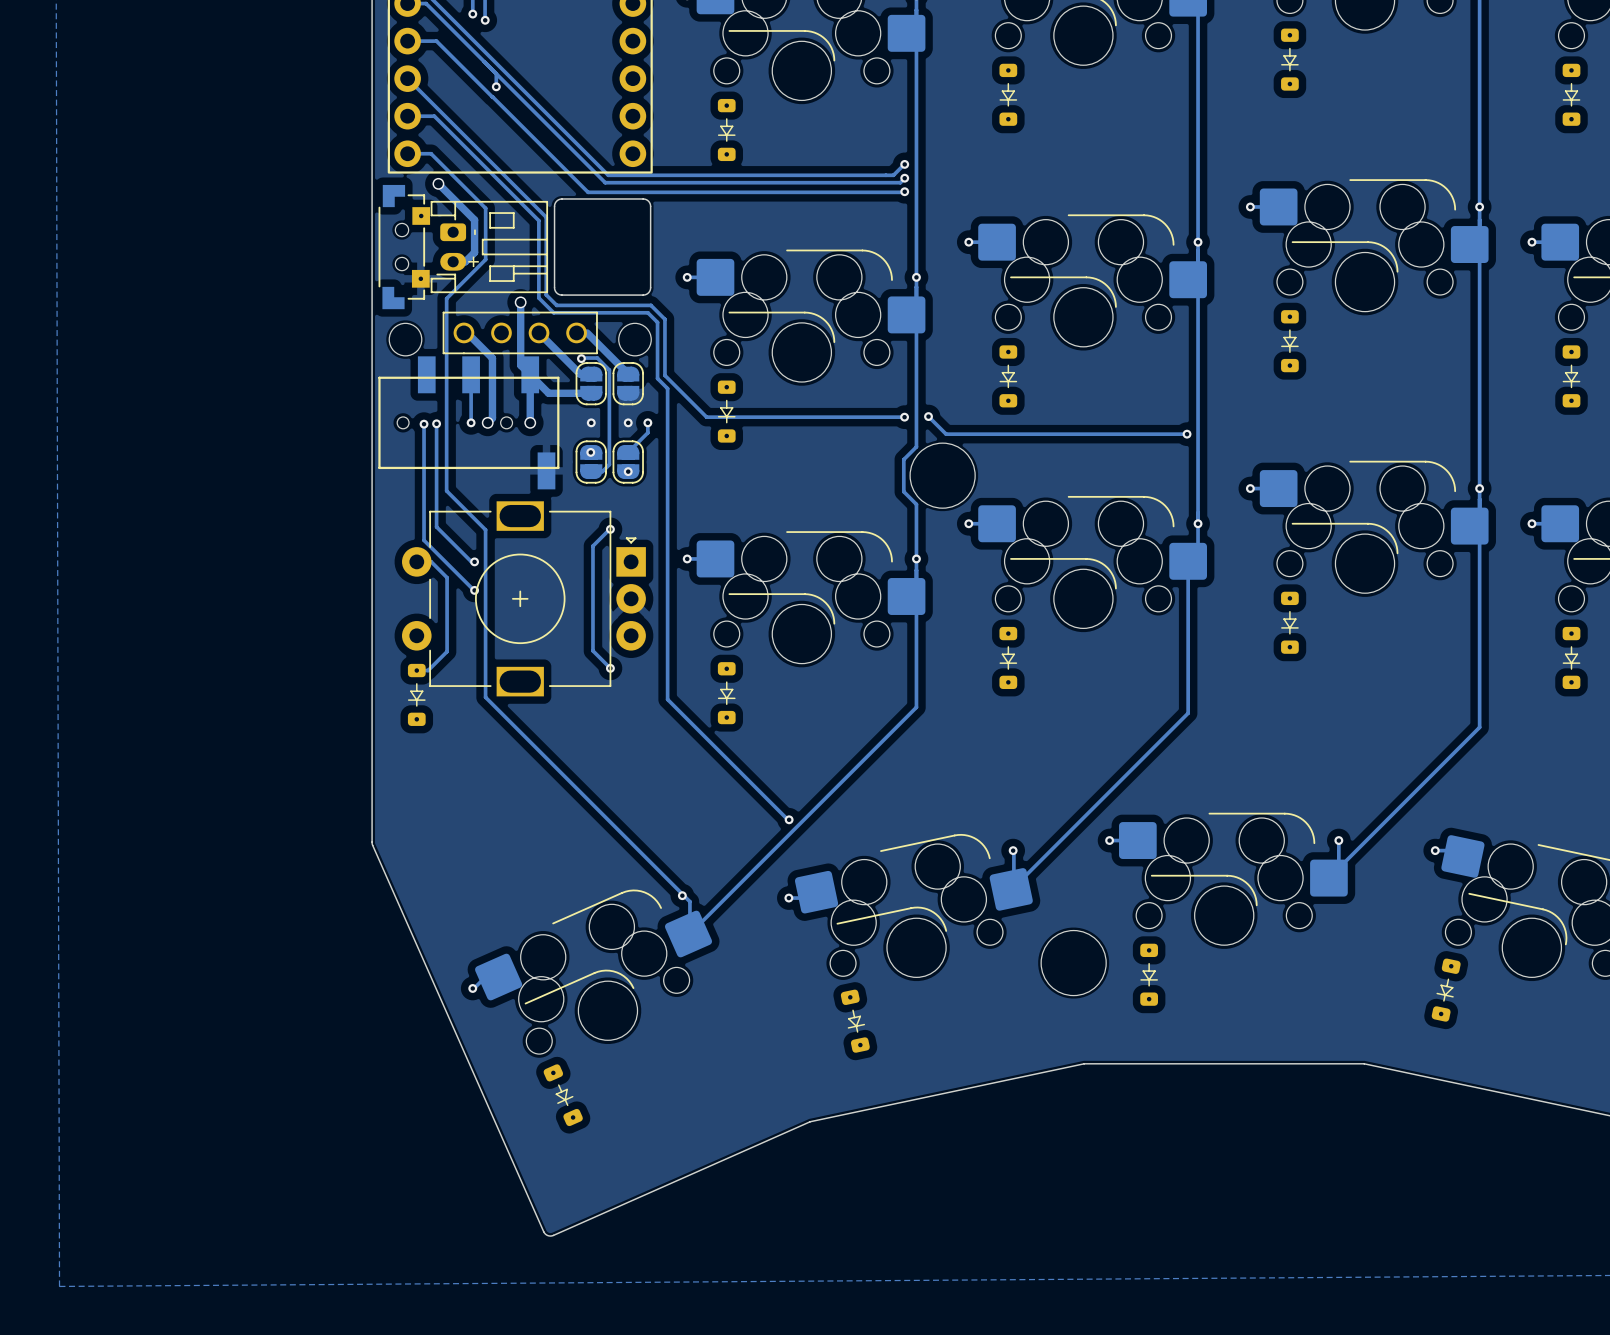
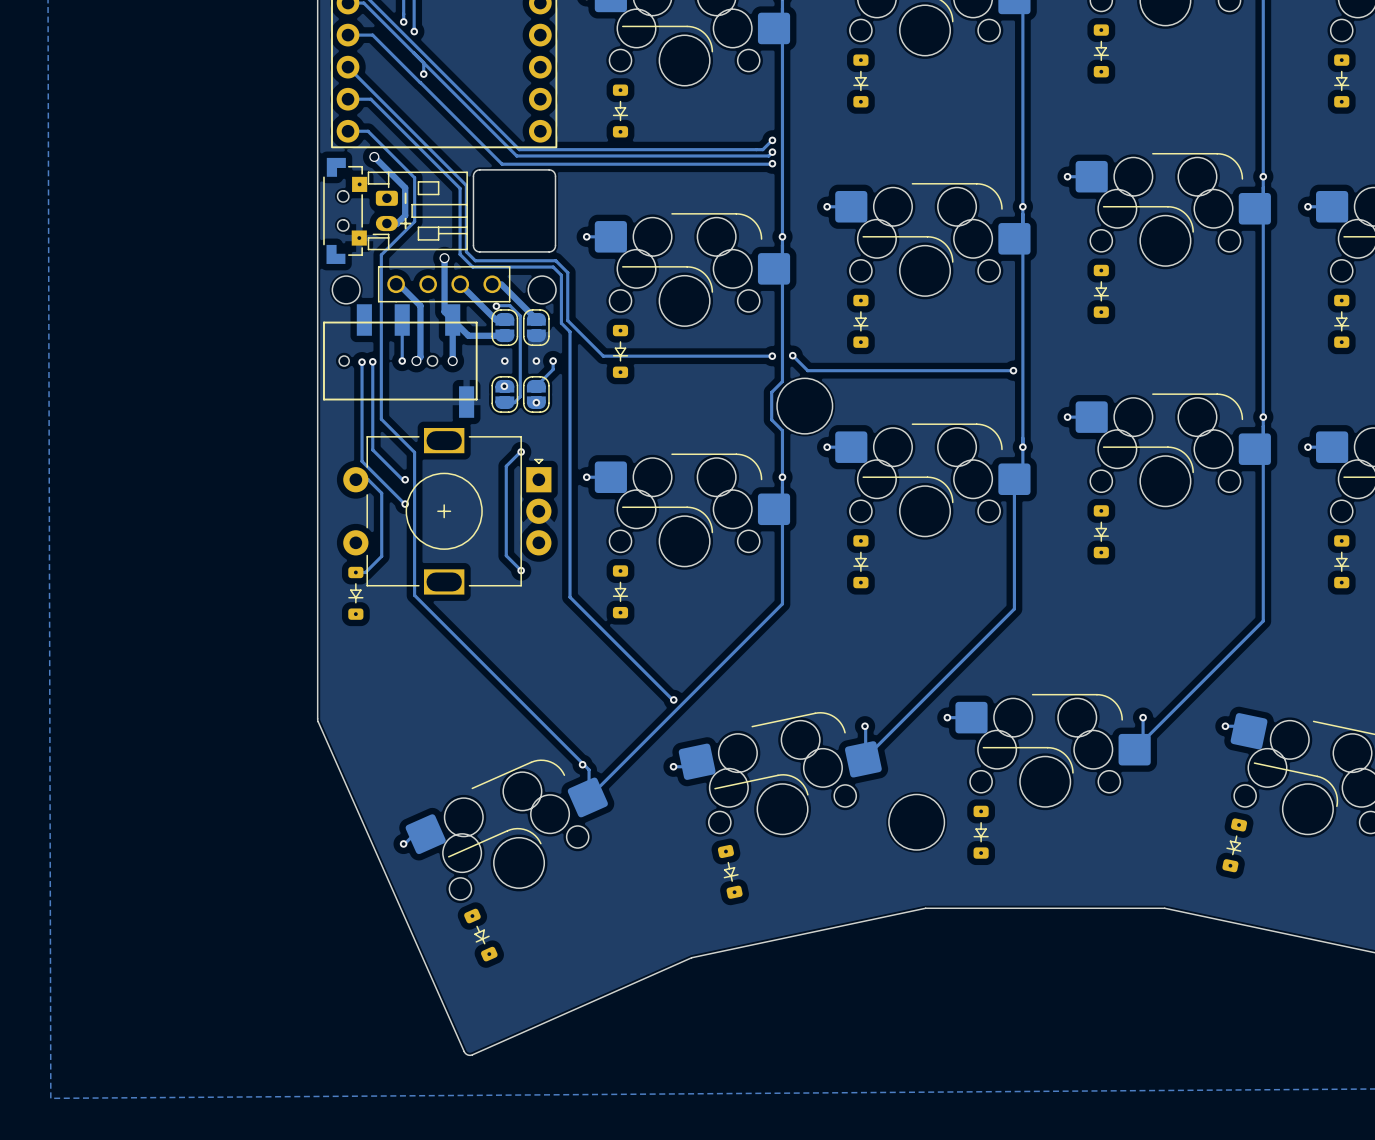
via: (472, 14) -> none
track: none -> (414, 17) (414, 28)
via: (485, 20) -> none
via: none -> (403, 21)
via: none -> (414, 31)

